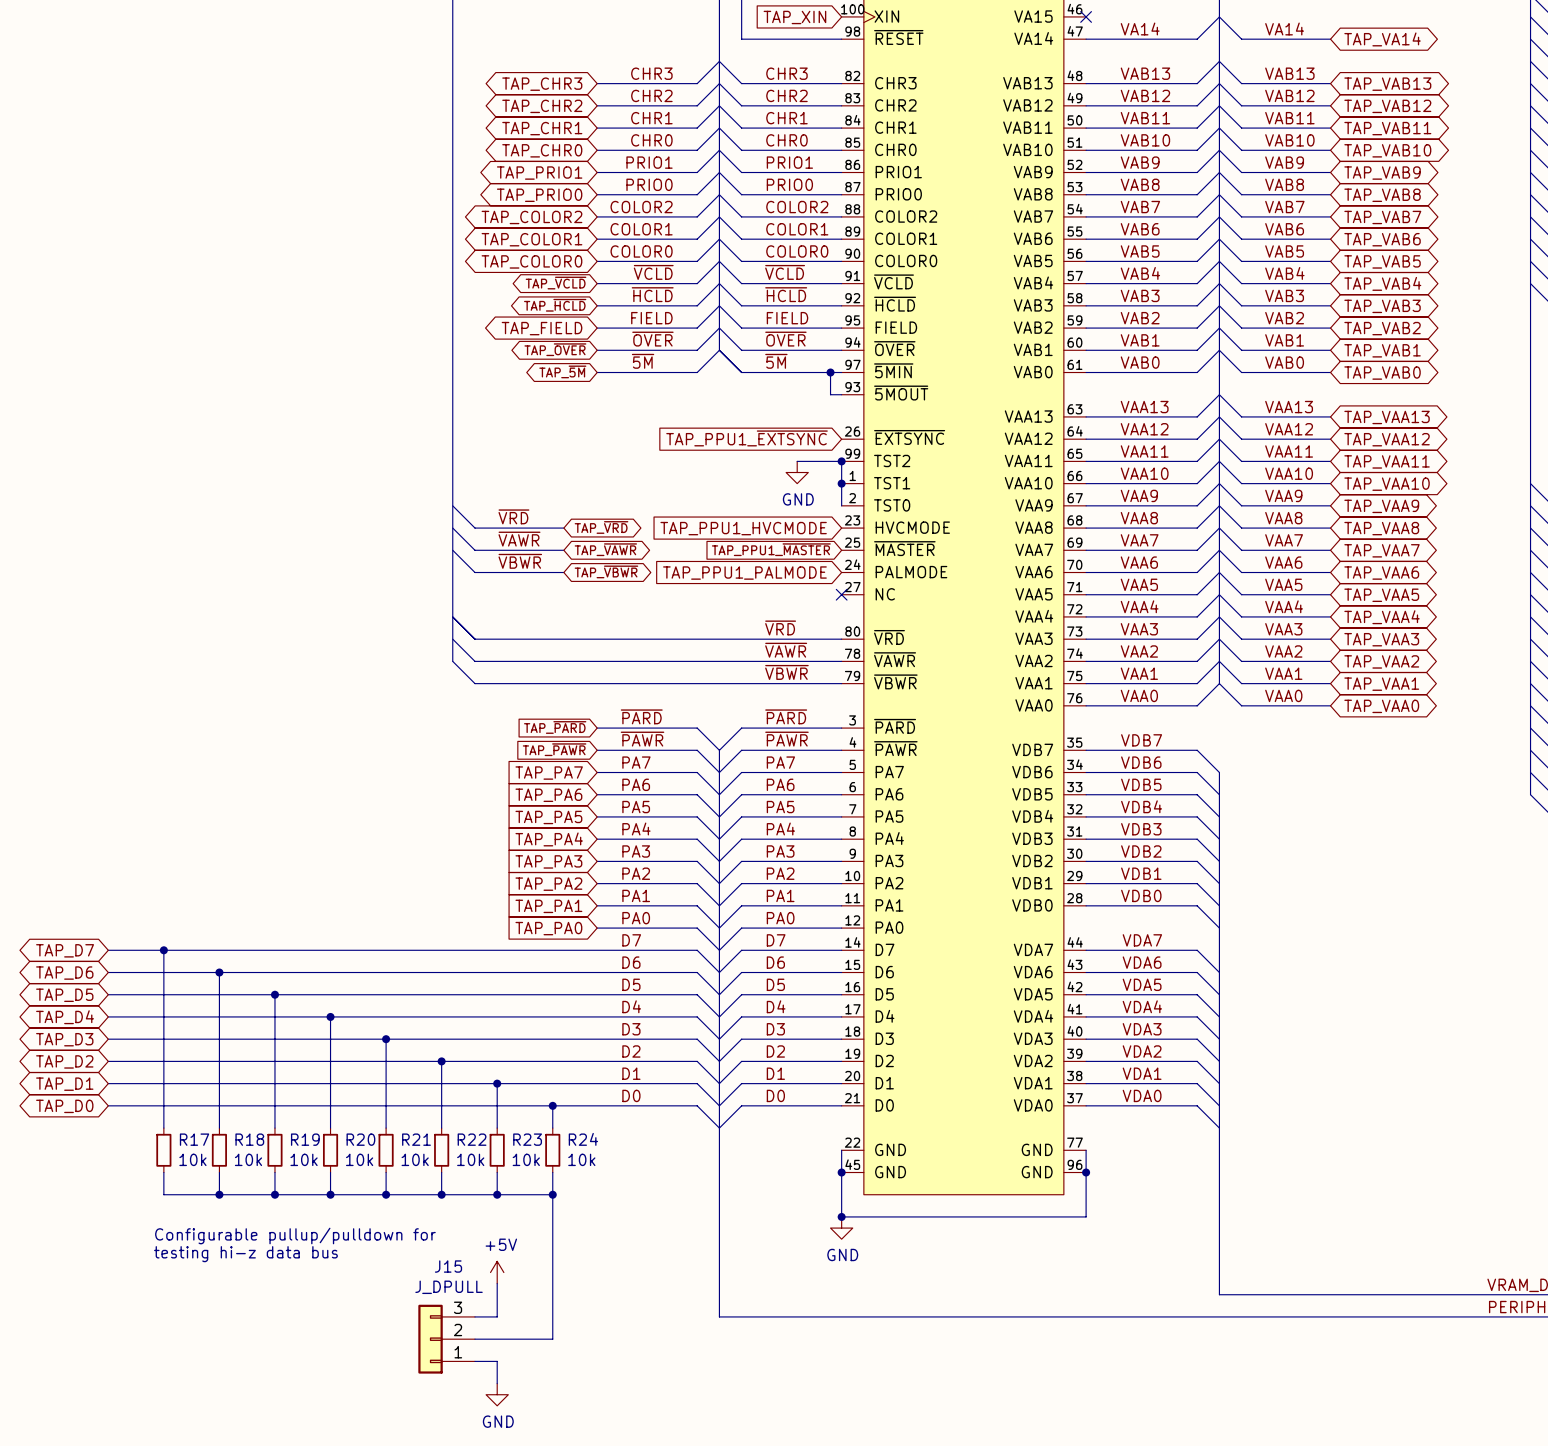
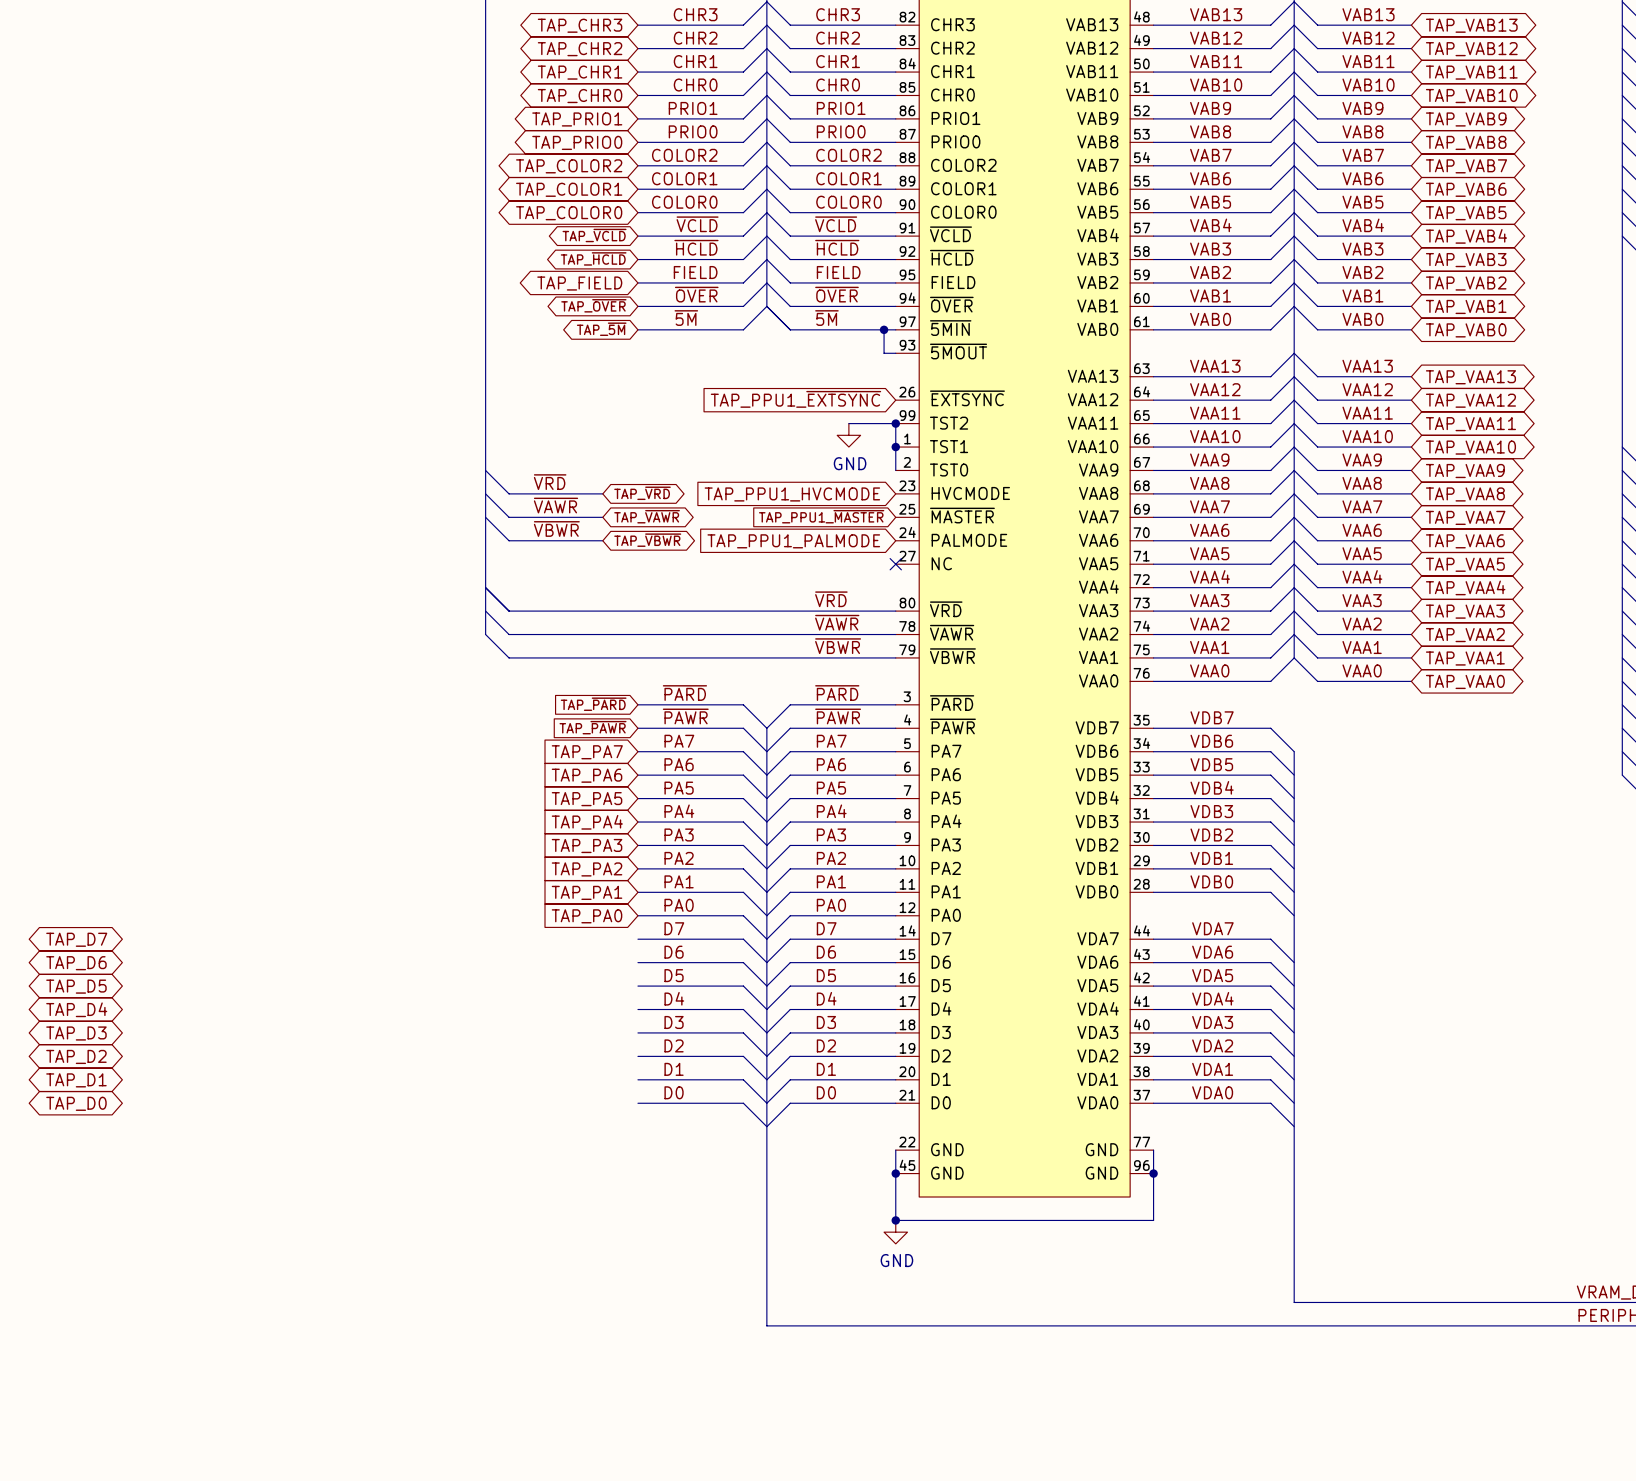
wire: (108, 950) (597, 950) -> none
wire: (163, 950) (163, 1128) -> none
junction: (163, 950) -> none
wire: (108, 972) (597, 972) -> none
wire: (219, 972) (219, 1128) -> none
junction: (219, 972) -> none
wire: (108, 994) (597, 994) -> none
wire: (274, 994) (274, 1128) -> none
junction: (274, 994) -> none
wire: (108, 1016) (597, 1016) -> none
wire: (330, 1016) (330, 1128) -> none
junction: (330, 1016) -> none
wire: (108, 1039) (597, 1039) -> none
wire: (386, 1039) (386, 1128) -> none
junction: (386, 1039) -> none
wire: (108, 1061) (597, 1061) -> none
wire: (441, 1061) (441, 1128) -> none
junction: (441, 1061) -> none
wire: (108, 1083) (597, 1083) -> none
wire: (497, 1083) (497, 1128) -> none
junction: (497, 1083) -> none
wire: (108, 1105) (597, 1105) -> none
wire: (552, 1105) (552, 1128) -> none
junction: (552, 1105) -> none
R17: 10k (163, 1150) -> none
R18: 10k (219, 1150) -> none
R19: 10k (274, 1150) -> none
R20: 10k (330, 1150) -> none
R21: 10k (386, 1150) -> none
R22: 10k (441, 1150) -> none
R23: 10k (497, 1150) -> none
R24: 10k (552, 1150) -> none
wire: (163, 1172) (163, 1194) (552, 1194) -> none
wire: (219, 1172) (219, 1194) -> none
wire: (274, 1172) (274, 1194) -> none
wire: (330, 1172) (330, 1194) -> none
wire: (386, 1172) (386, 1194) -> none
wire: (441, 1172) (441, 1194) -> none
wire: (497, 1172) (497, 1194) -> none
wire: (552, 1172) (552, 1339) (474, 1339) -> none
junction: (219, 1194) -> none
junction: (274, 1194) -> none
junction: (330, 1194) -> none
junction: (386, 1194) -> none
junction: (441, 1194) -> none
junction: (497, 1194) -> none
junction: (552, 1194) -> none
text: Configurable pullup/pulldown for (295, 1236) -> none
text: testing hi-z data bus (245, 1254) -> none
power symbol: +5V (497, 1272) -> none
wire: (497, 1283) (497, 1316) (474, 1316) -> none
J15: J_DPULL (446, 1339) -> none
wire: (474, 1361) (497, 1361) (497, 1383) -> none
power symbol: GND (497, 1394) -> none

